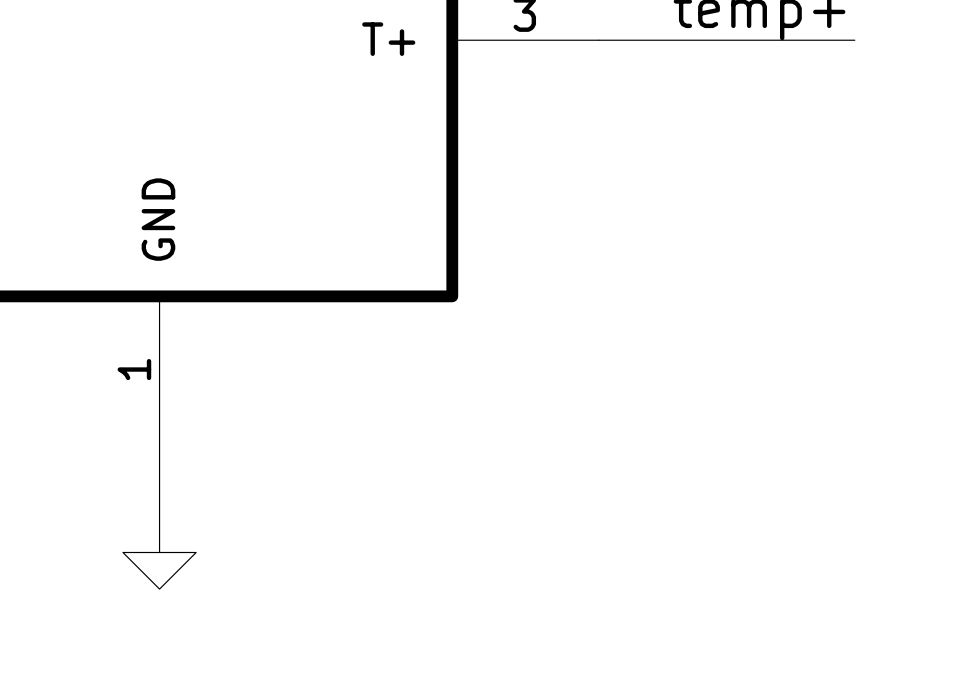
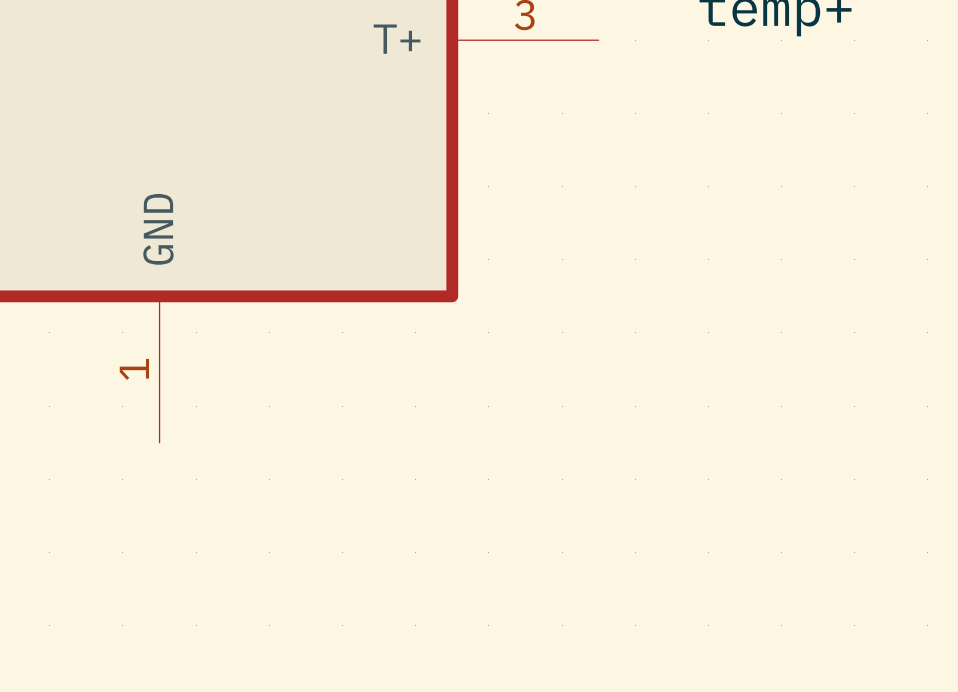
wire: (598, 40) (854, 40) -> none
wire: (159, 442) (159, 515) -> none
power symbol: (159, 552) -> none

